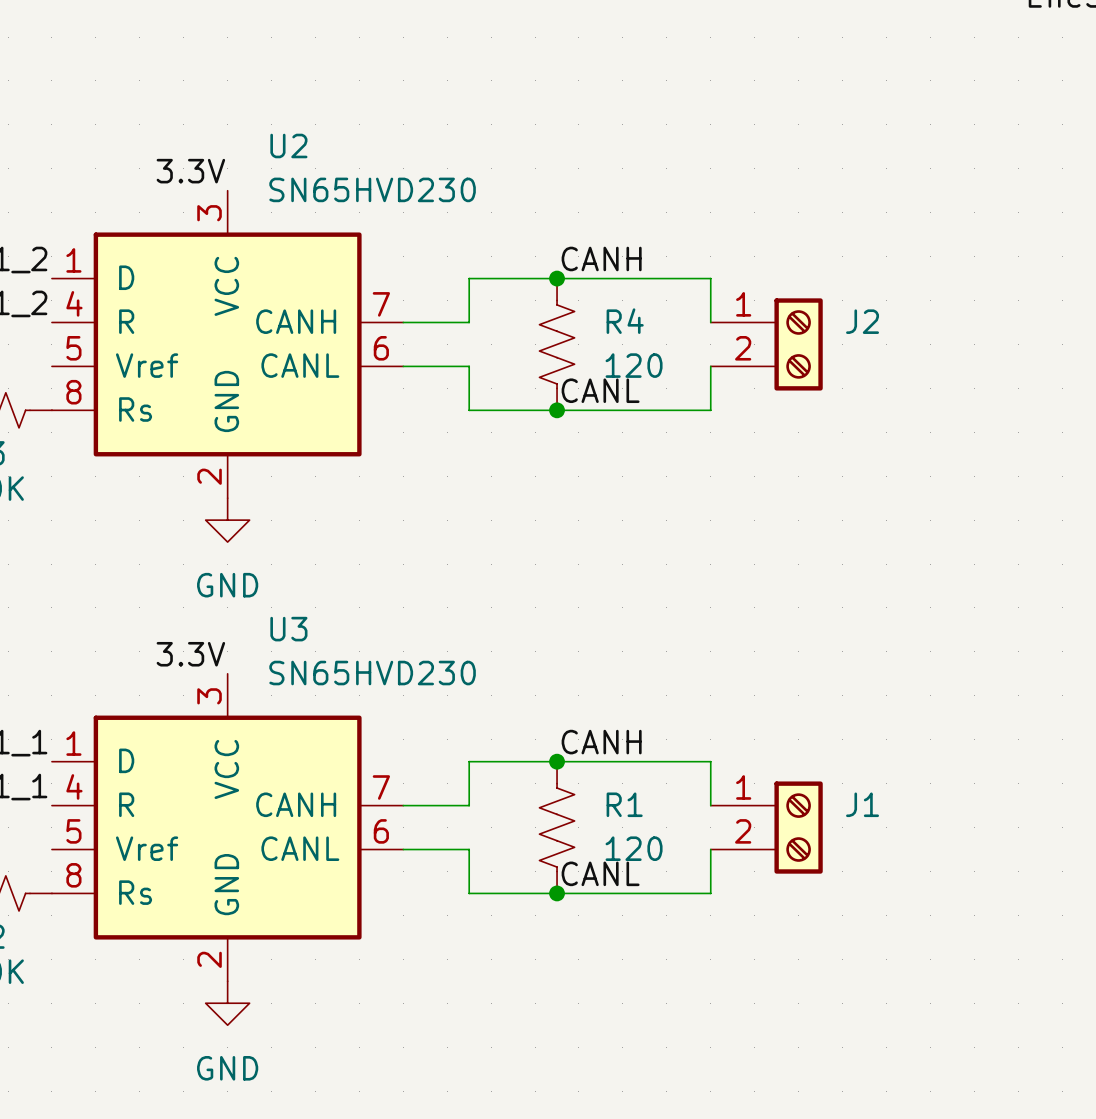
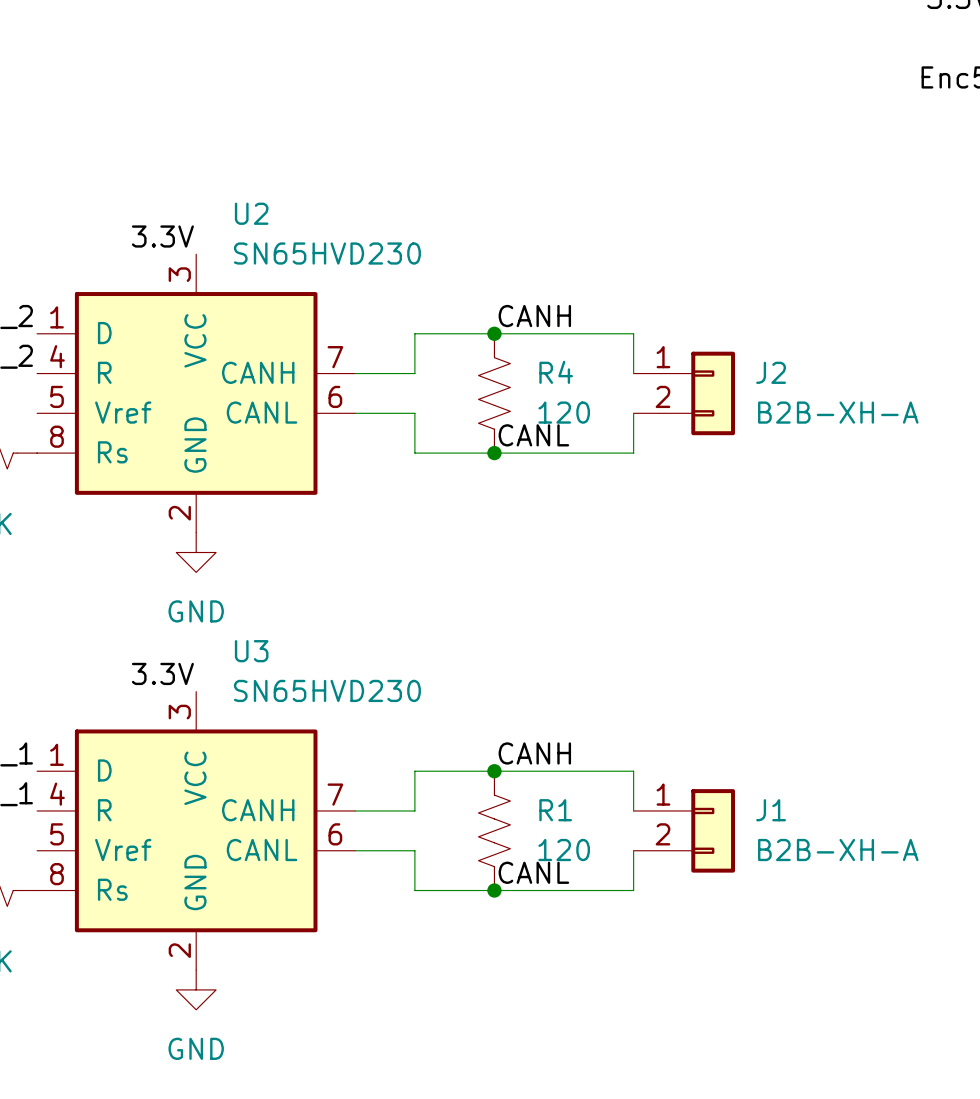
J2 symbol: [710, 298, 823, 391] -> [633, 351, 736, 436]
J2 value: none -> B2B-XH-A (838, 412)
J1 symbol: [710, 781, 823, 874] -> [633, 789, 736, 873]
J1 value: none -> B2B-XH-A (838, 850)

